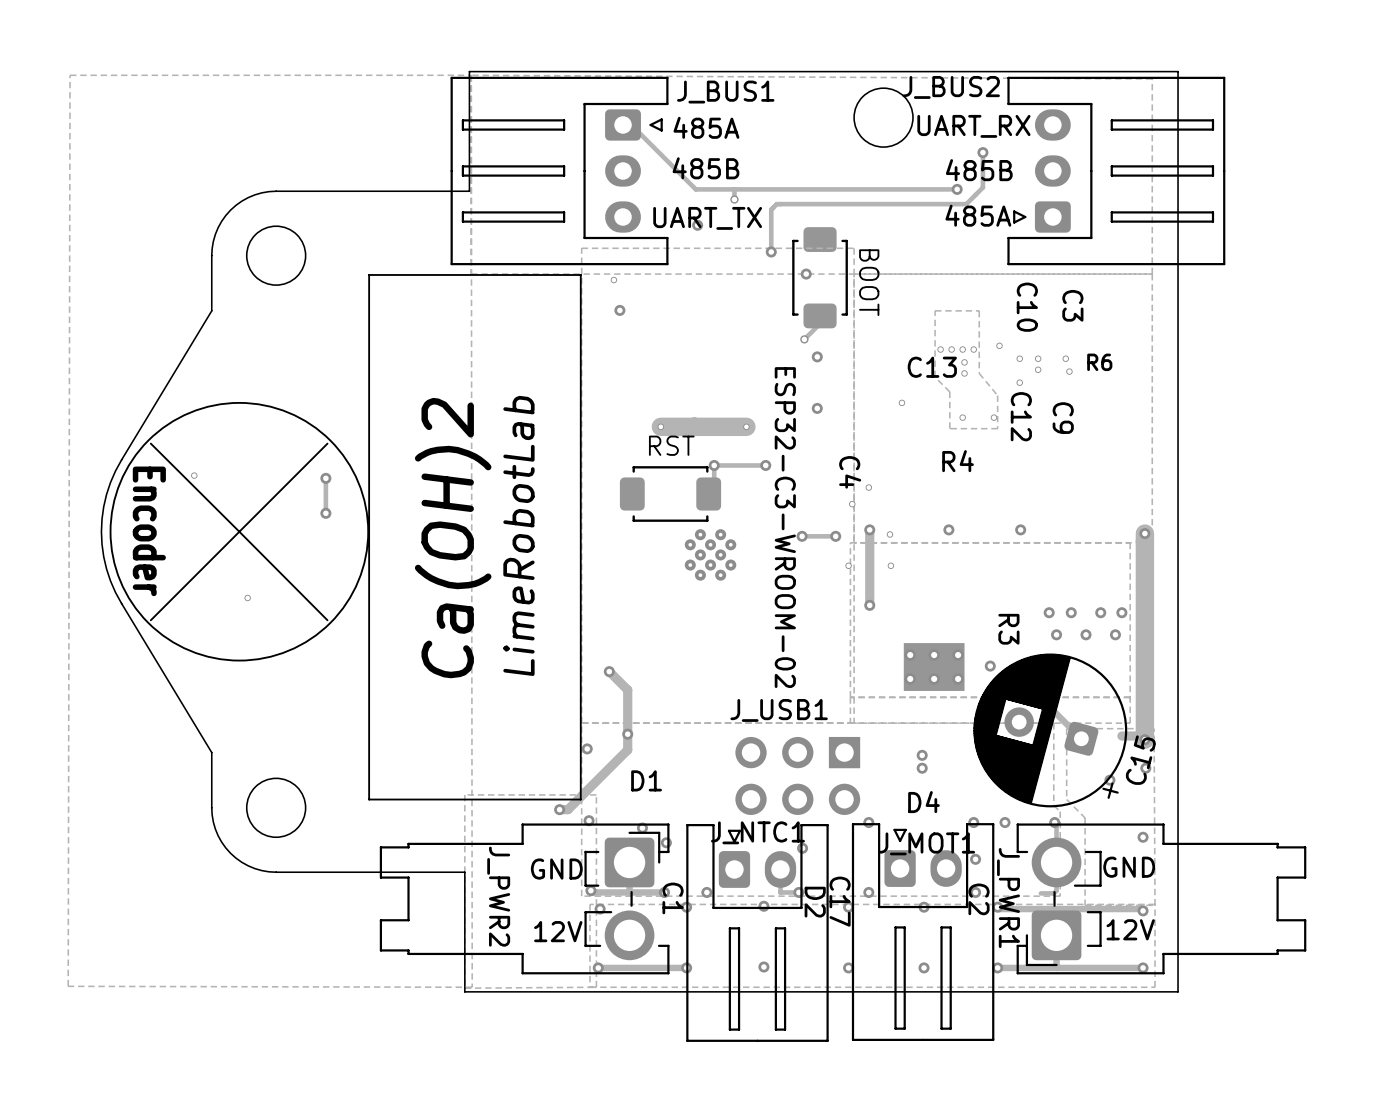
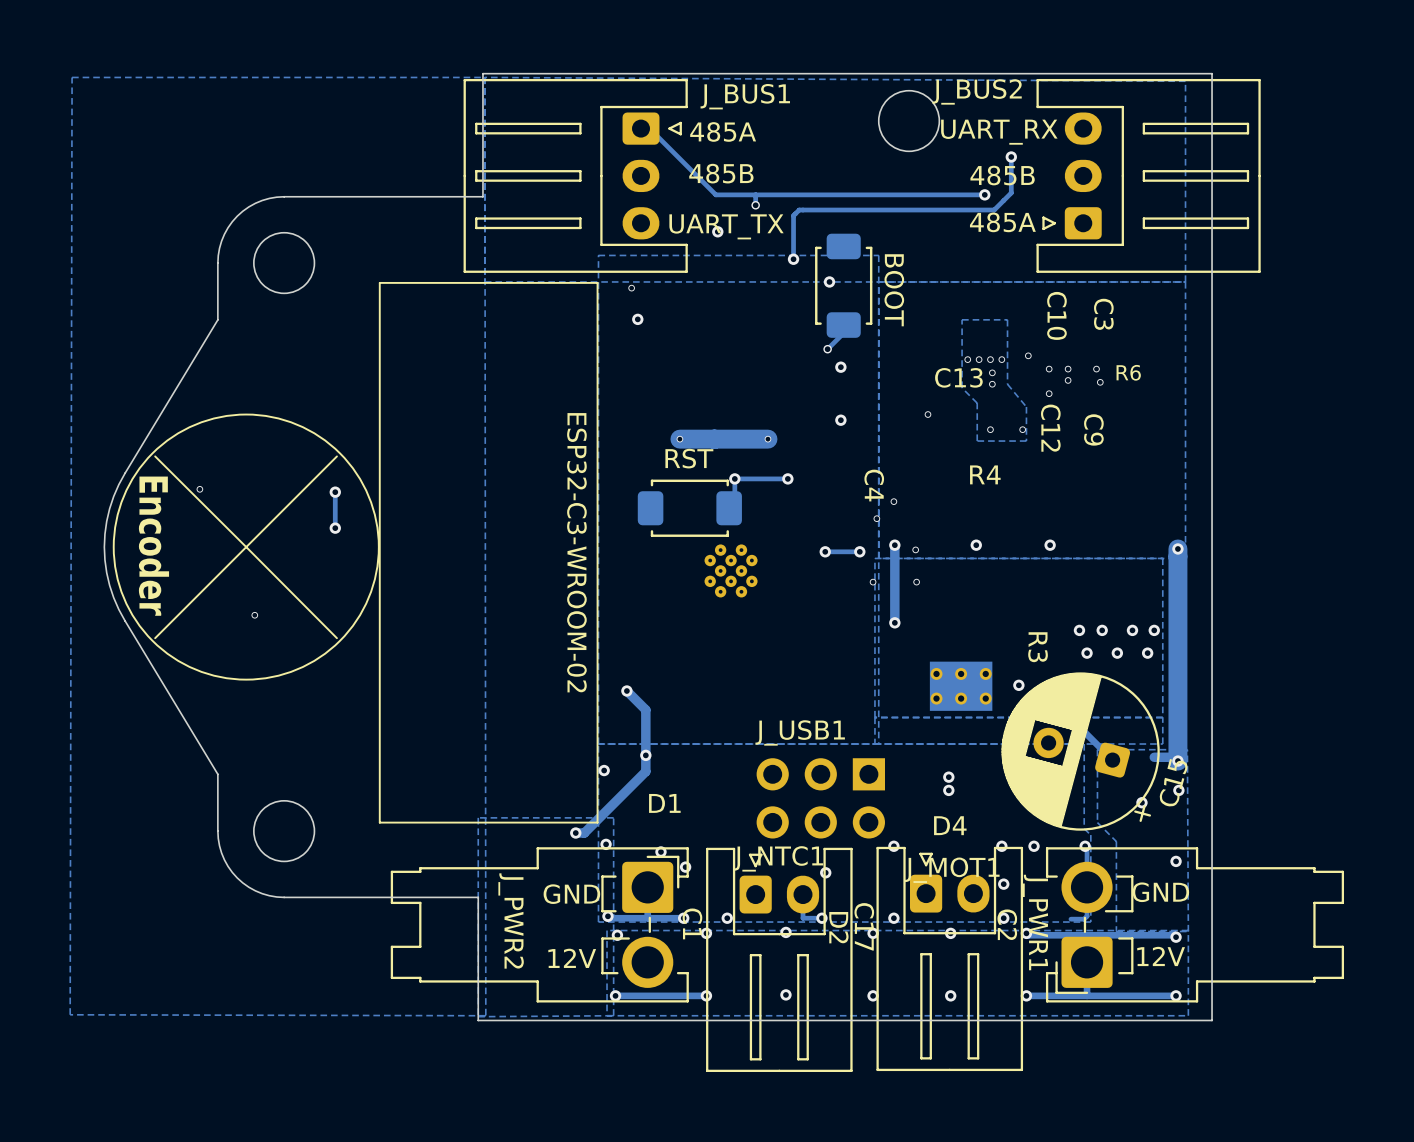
part value position: ESP32-C3-WROOM-02 (785, 527) -> ESP32-C3-WROOM-02 (576, 552)
text: LimeRobotLab (518, 535) -> none
text: Ca(OH)2 (453, 538) -> none

